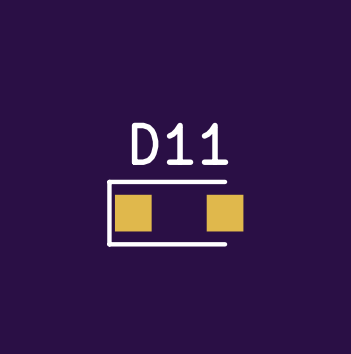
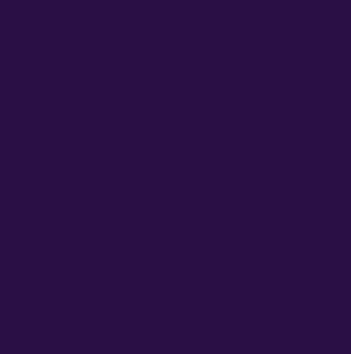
D11: (175, 213) -> none

